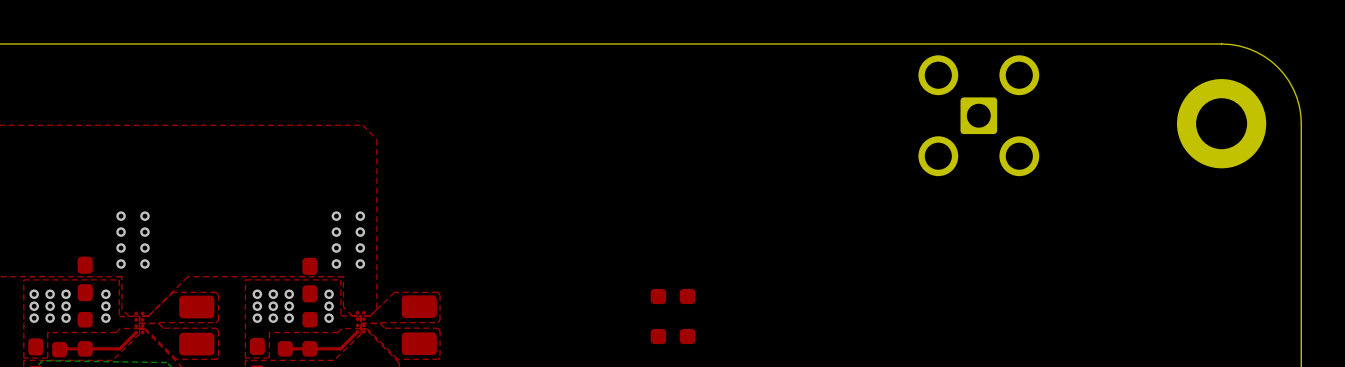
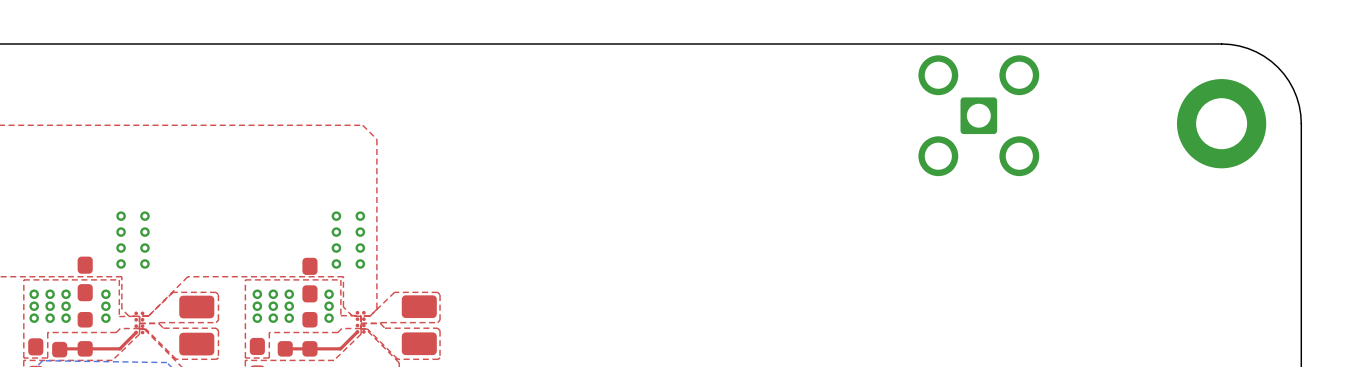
part: (672, 296) -> none
part: (672, 336) -> none

